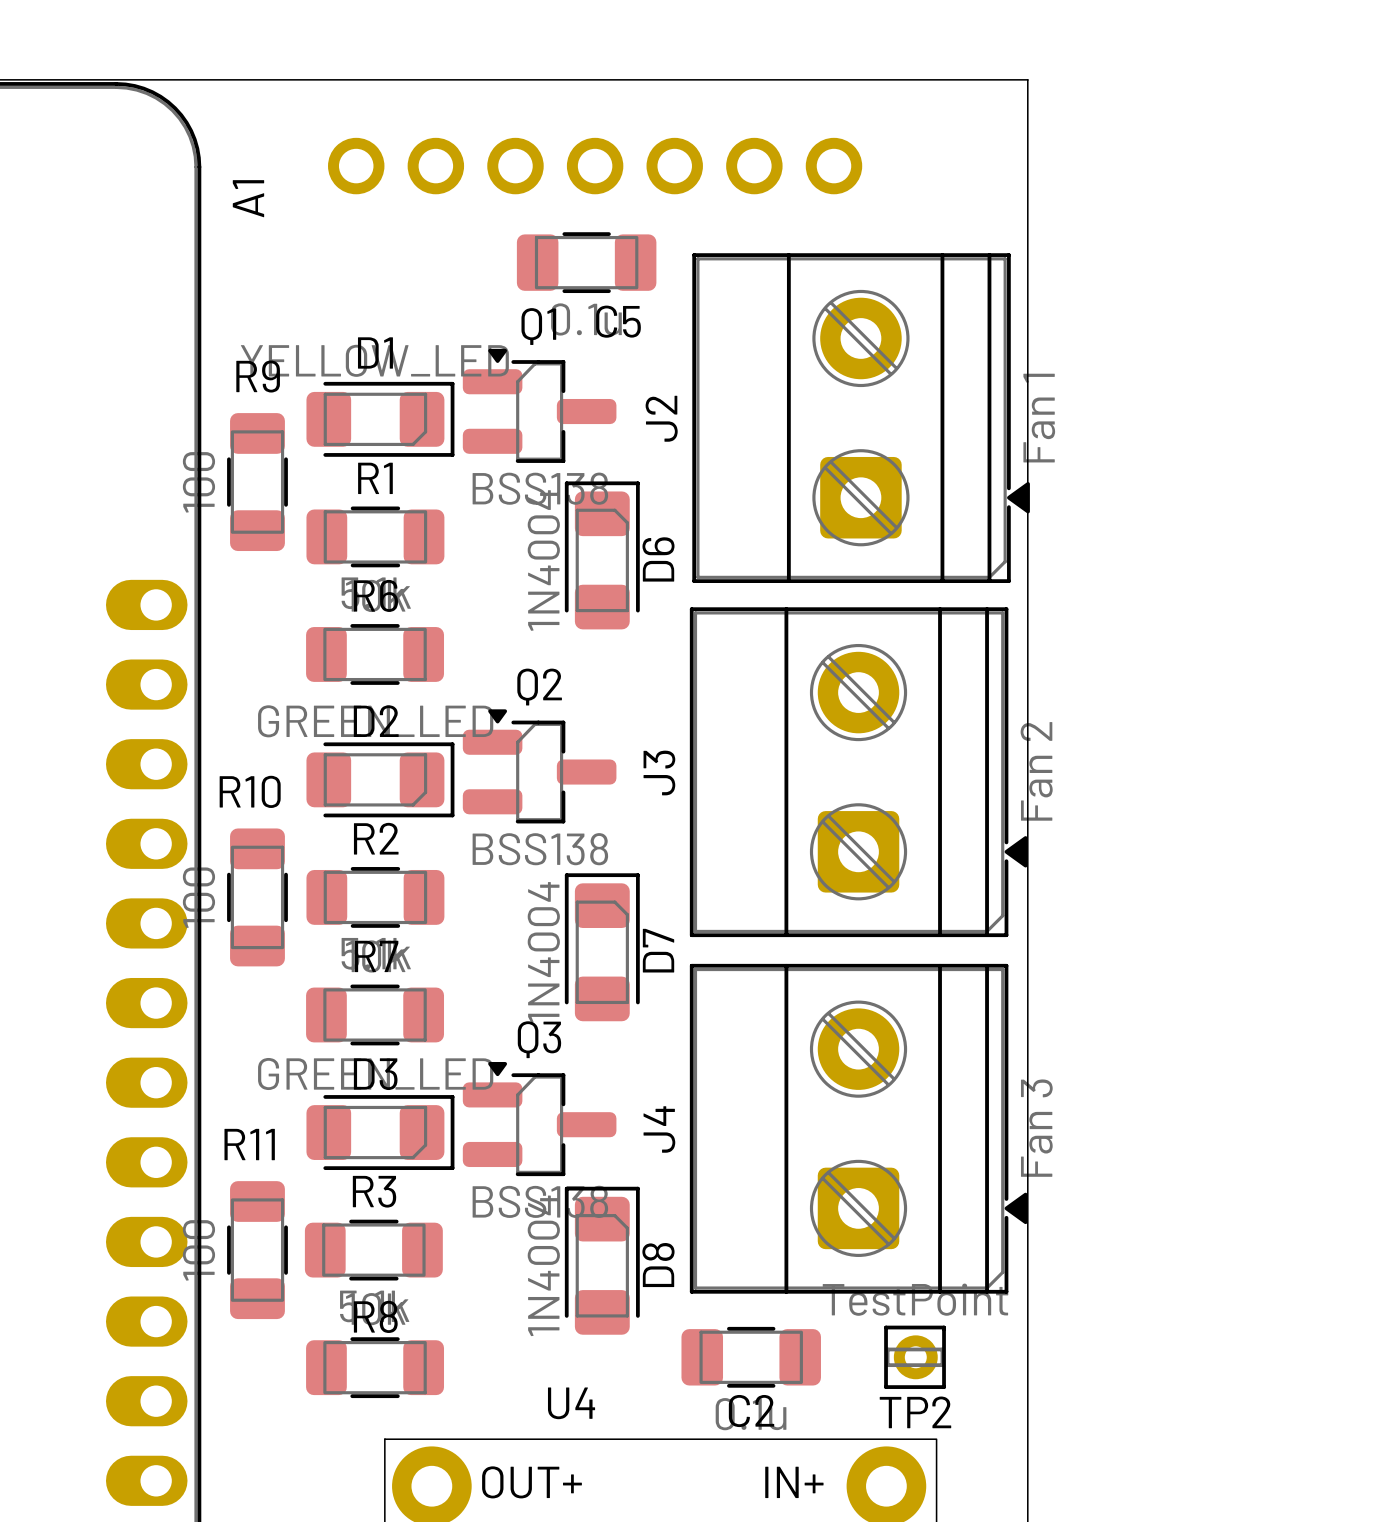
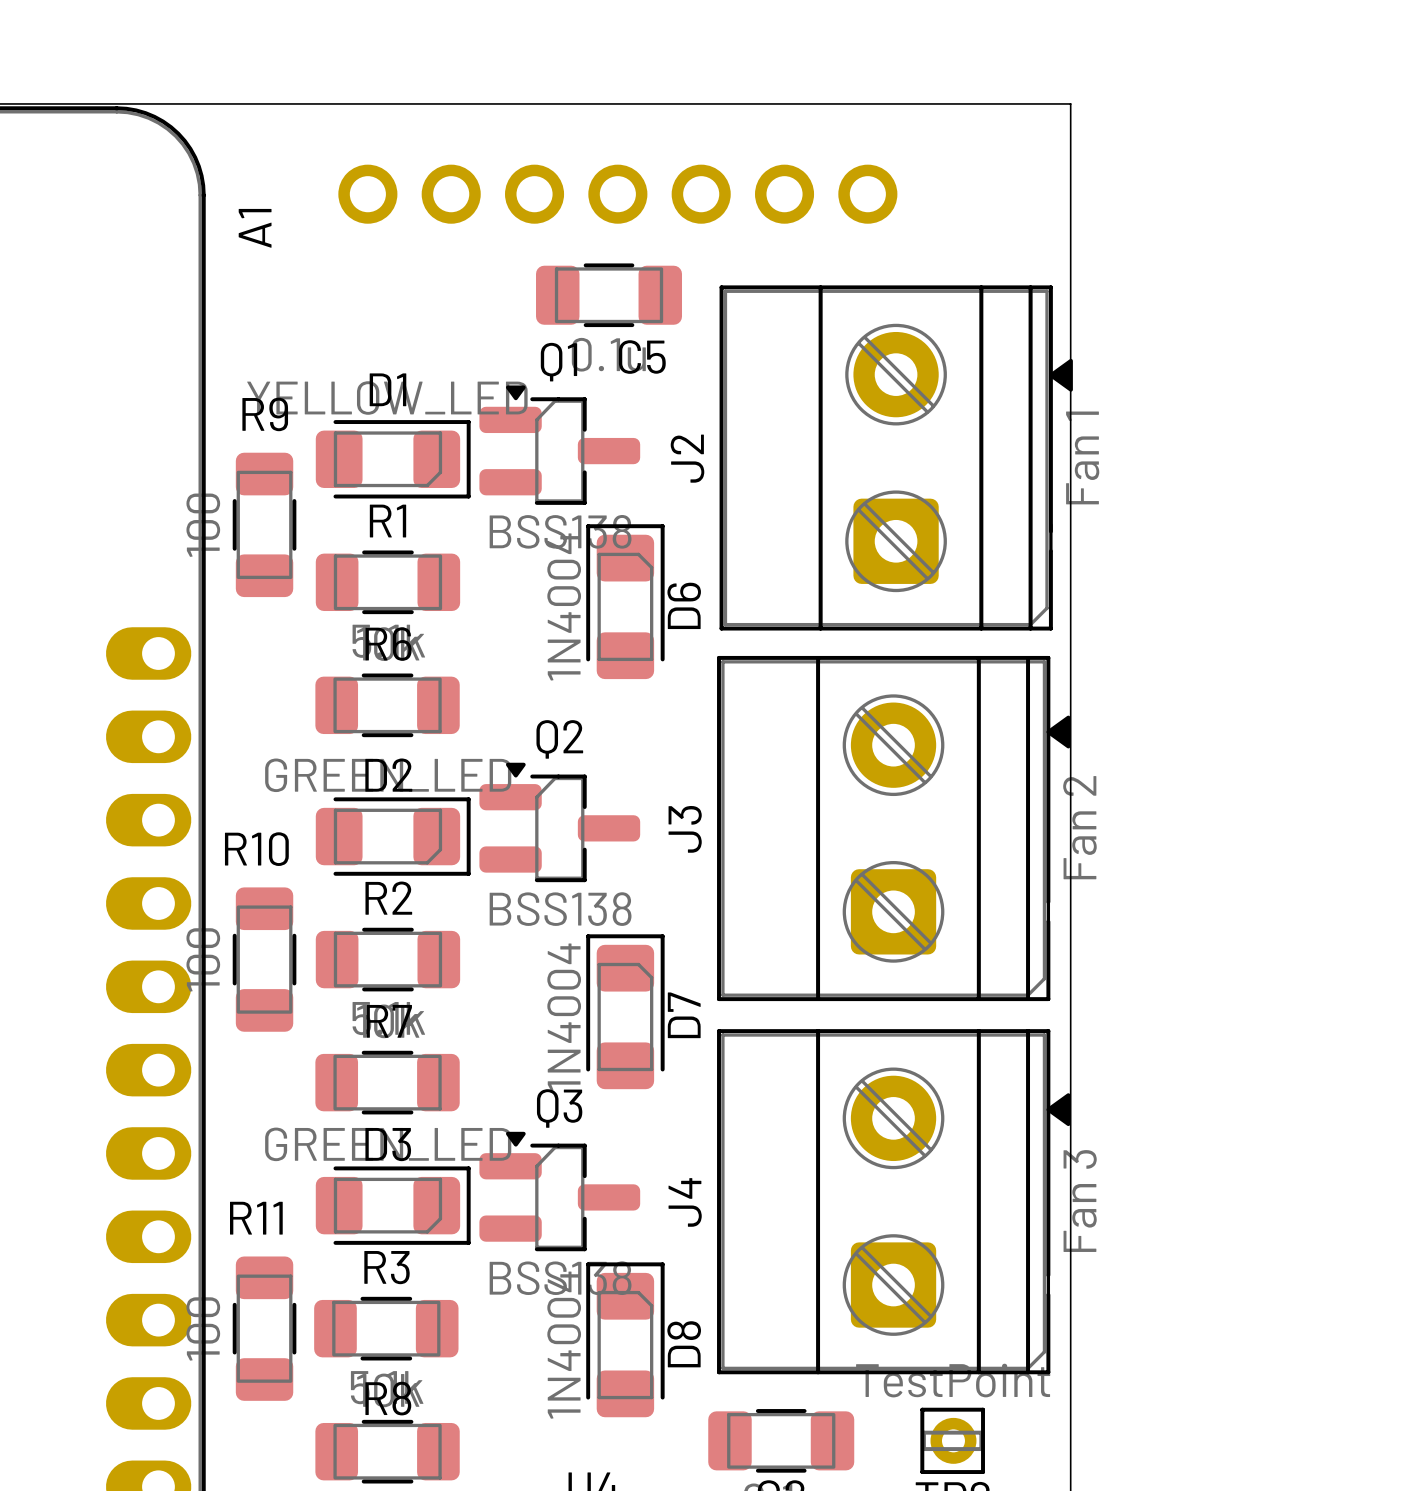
J2 footprint: [692, 253, 1030, 584] -> [719, 285, 1073, 631]
J3 footprint: [689, 607, 1028, 938] -> [717, 655, 1071, 1002]
J4 footprint: [689, 963, 1028, 1294] -> [717, 1029, 1071, 1375]

